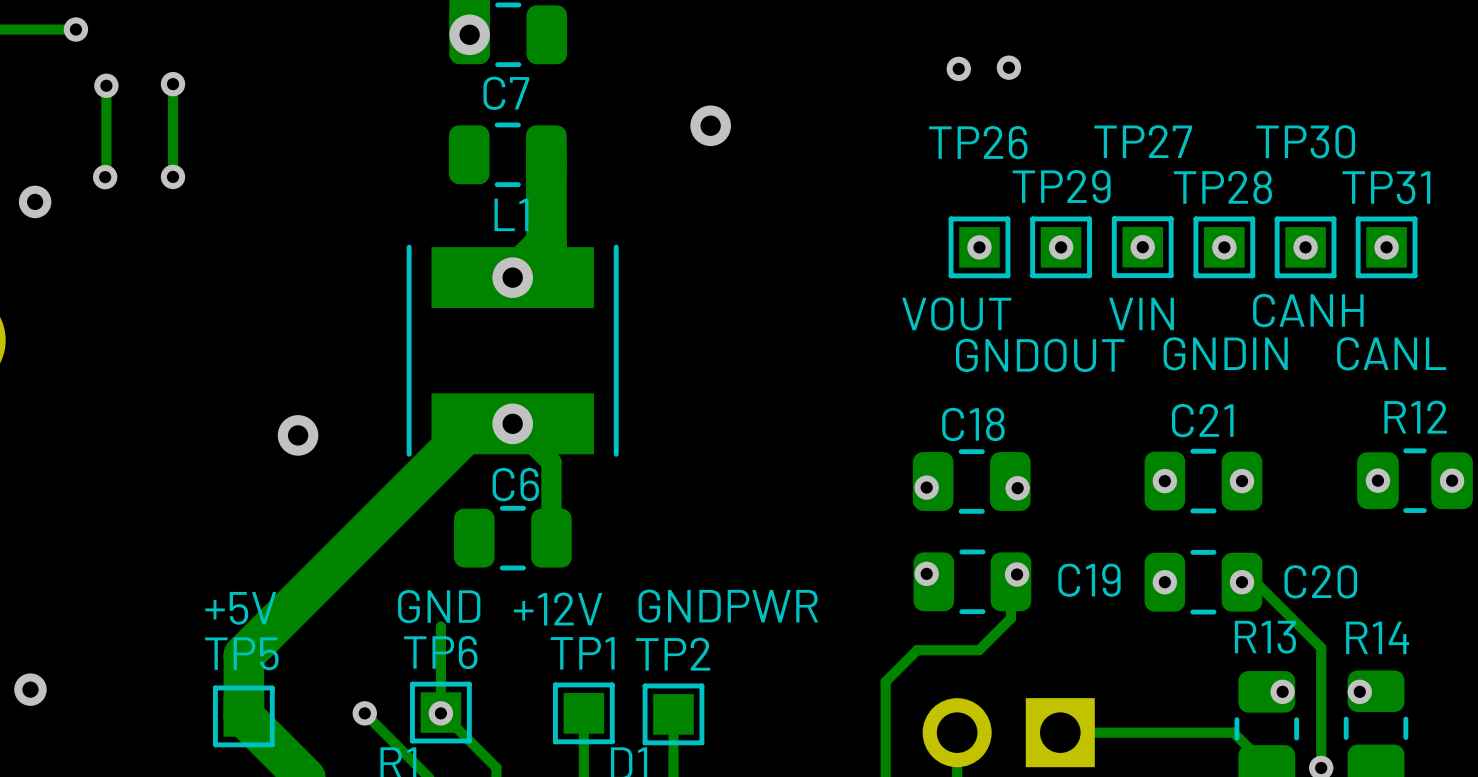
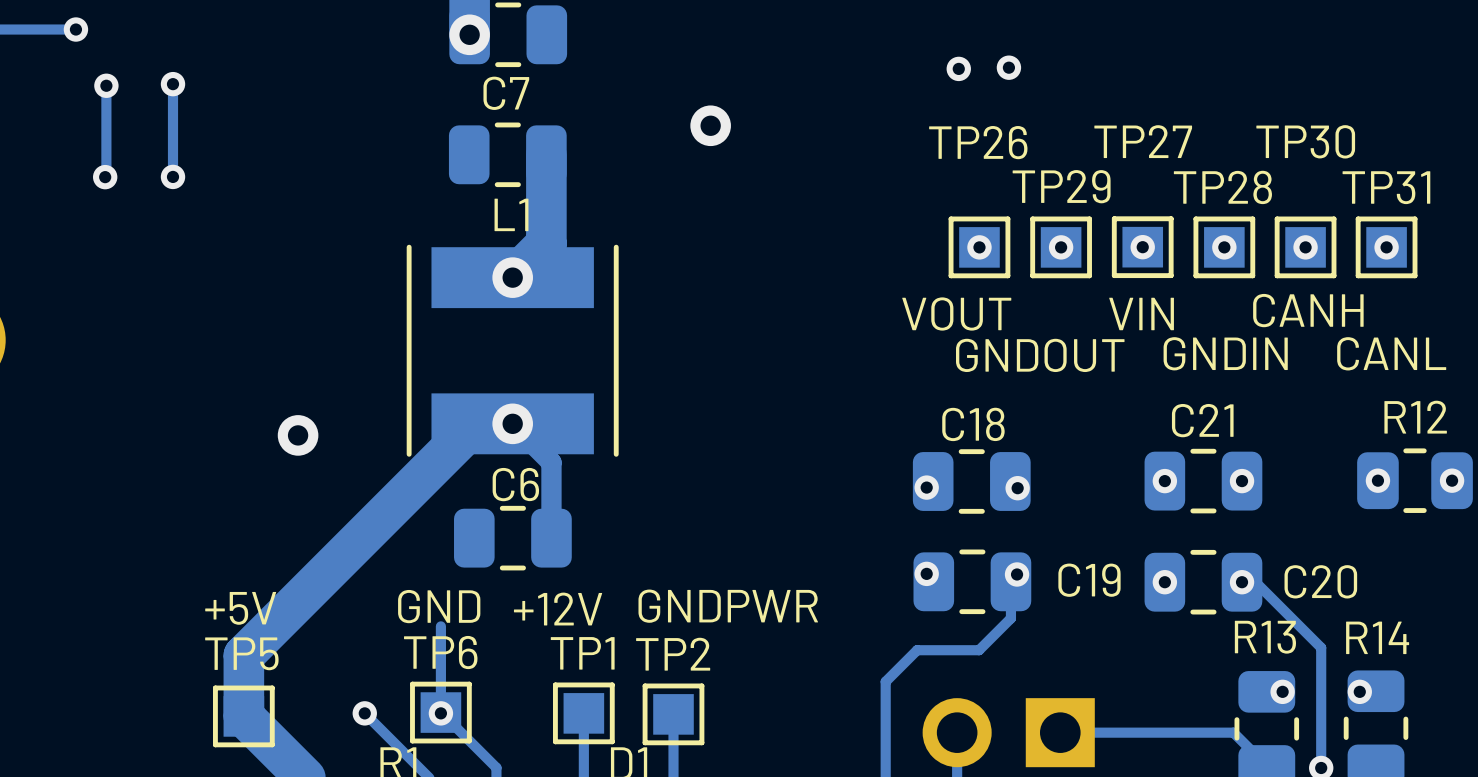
via: (35, 201) -> none
via: (30, 689) -> none

